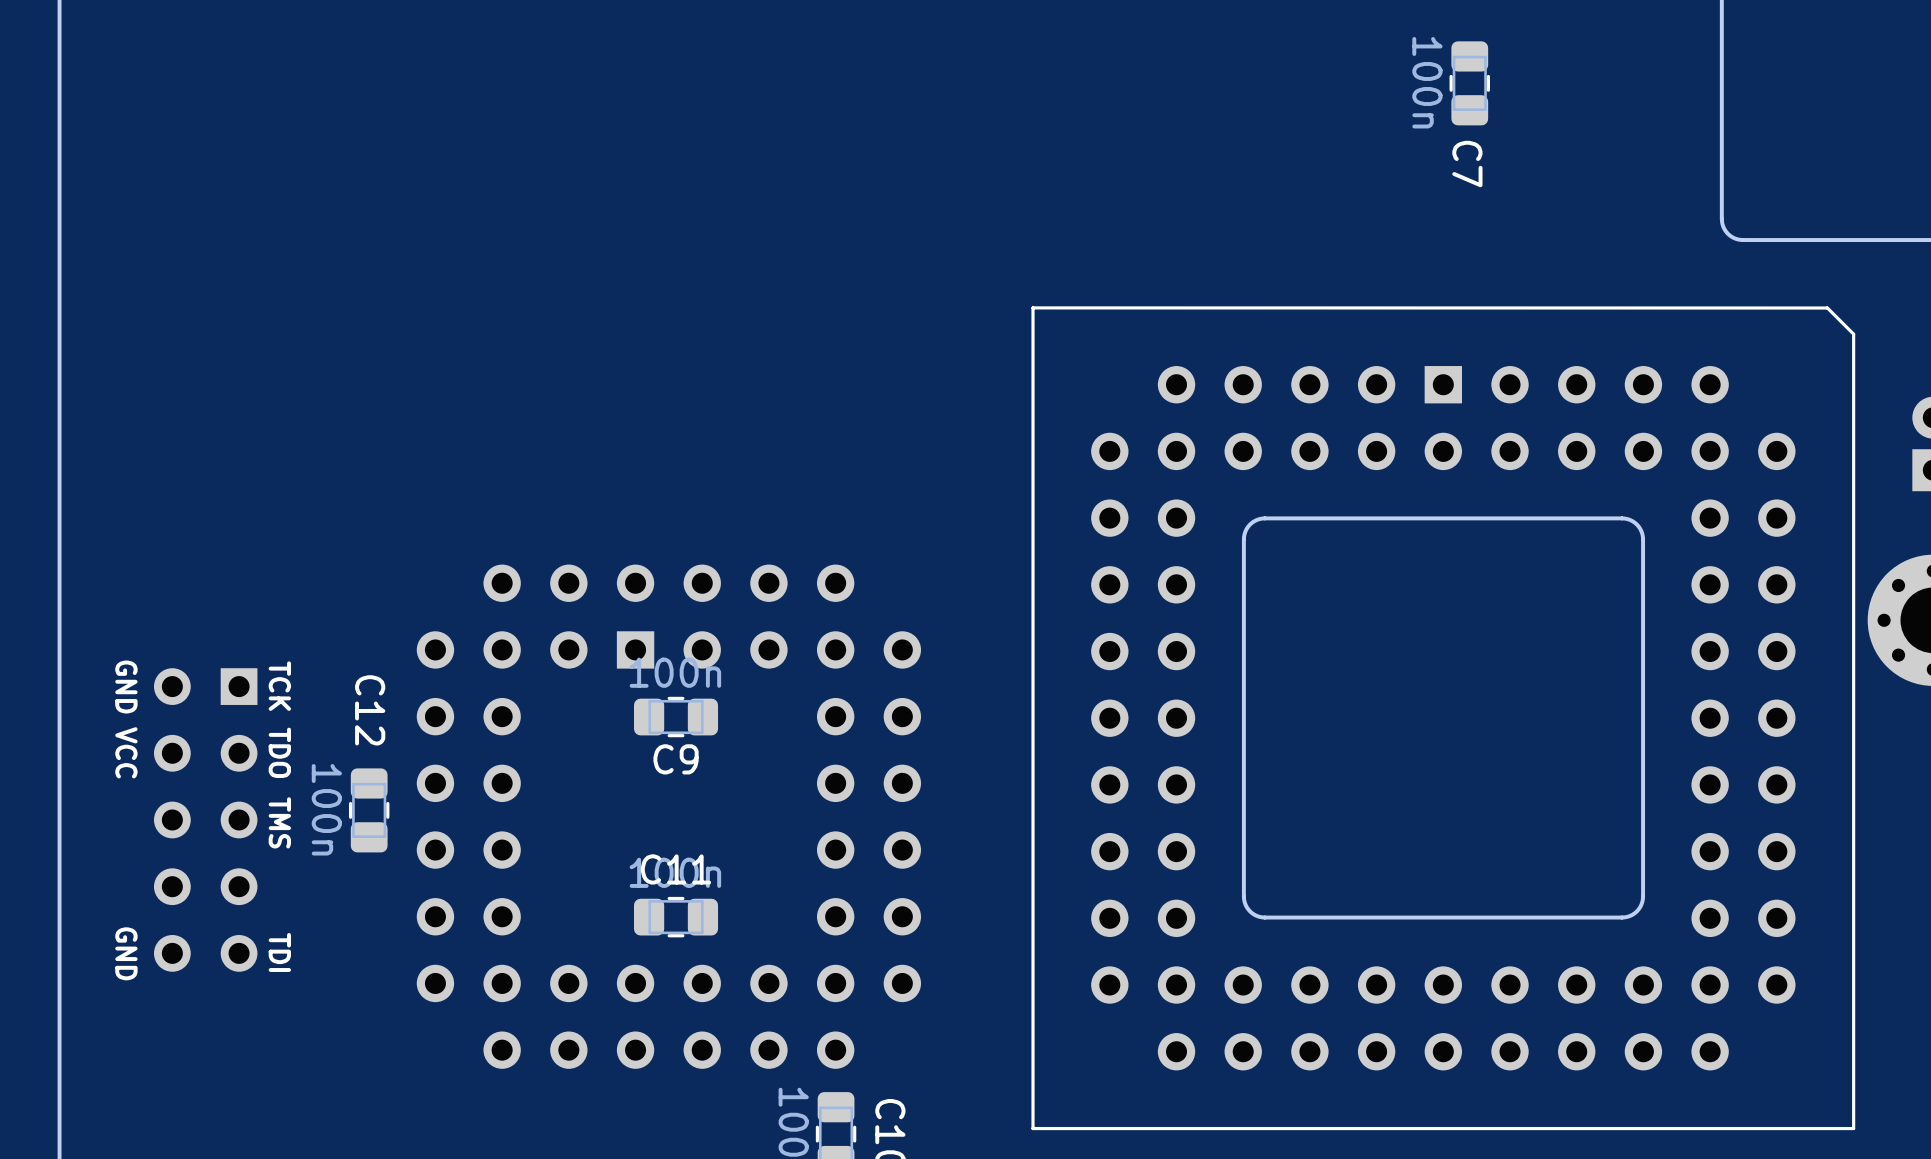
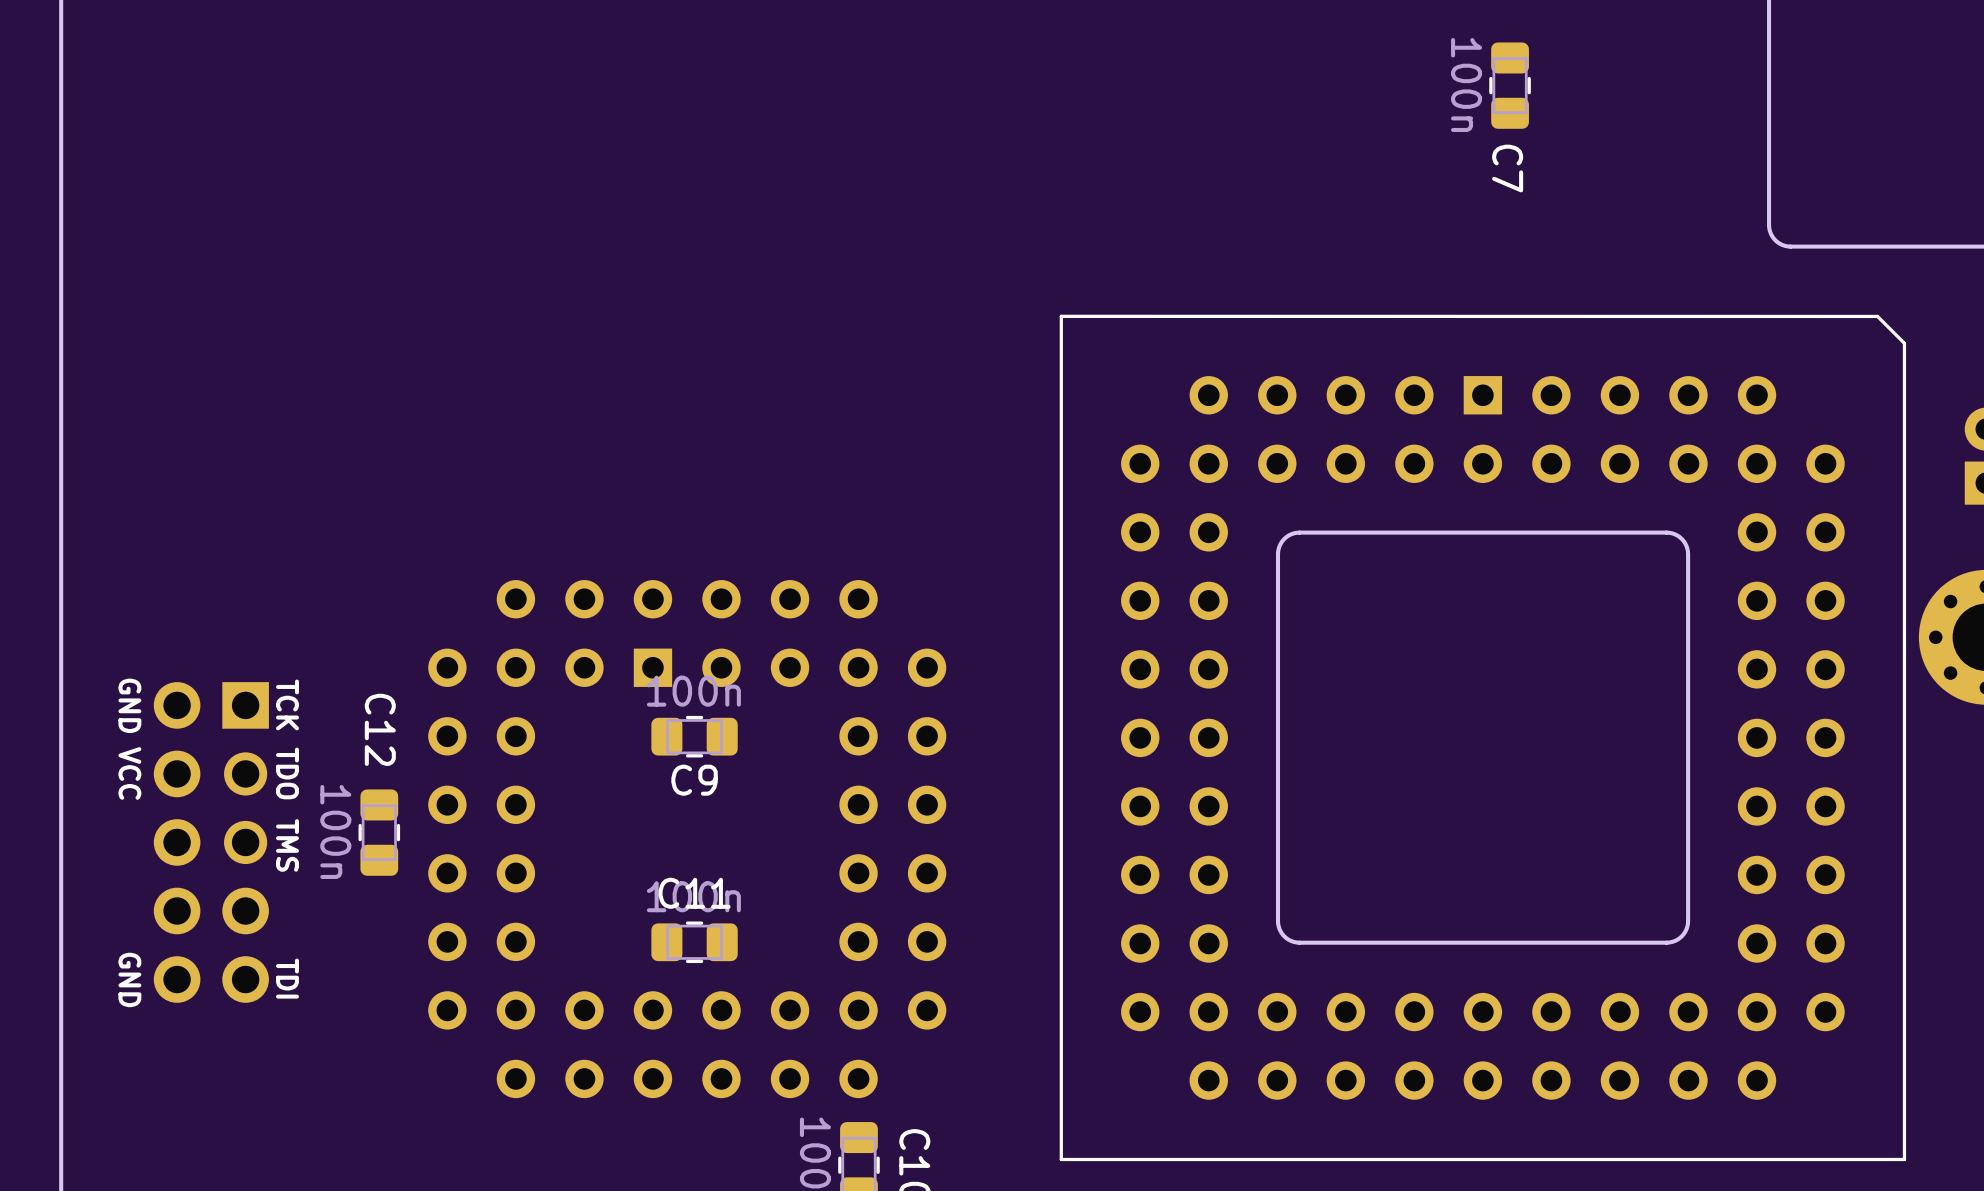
part footprint: [153, 668, 258, 972] -> [153, 682, 269, 1003]

